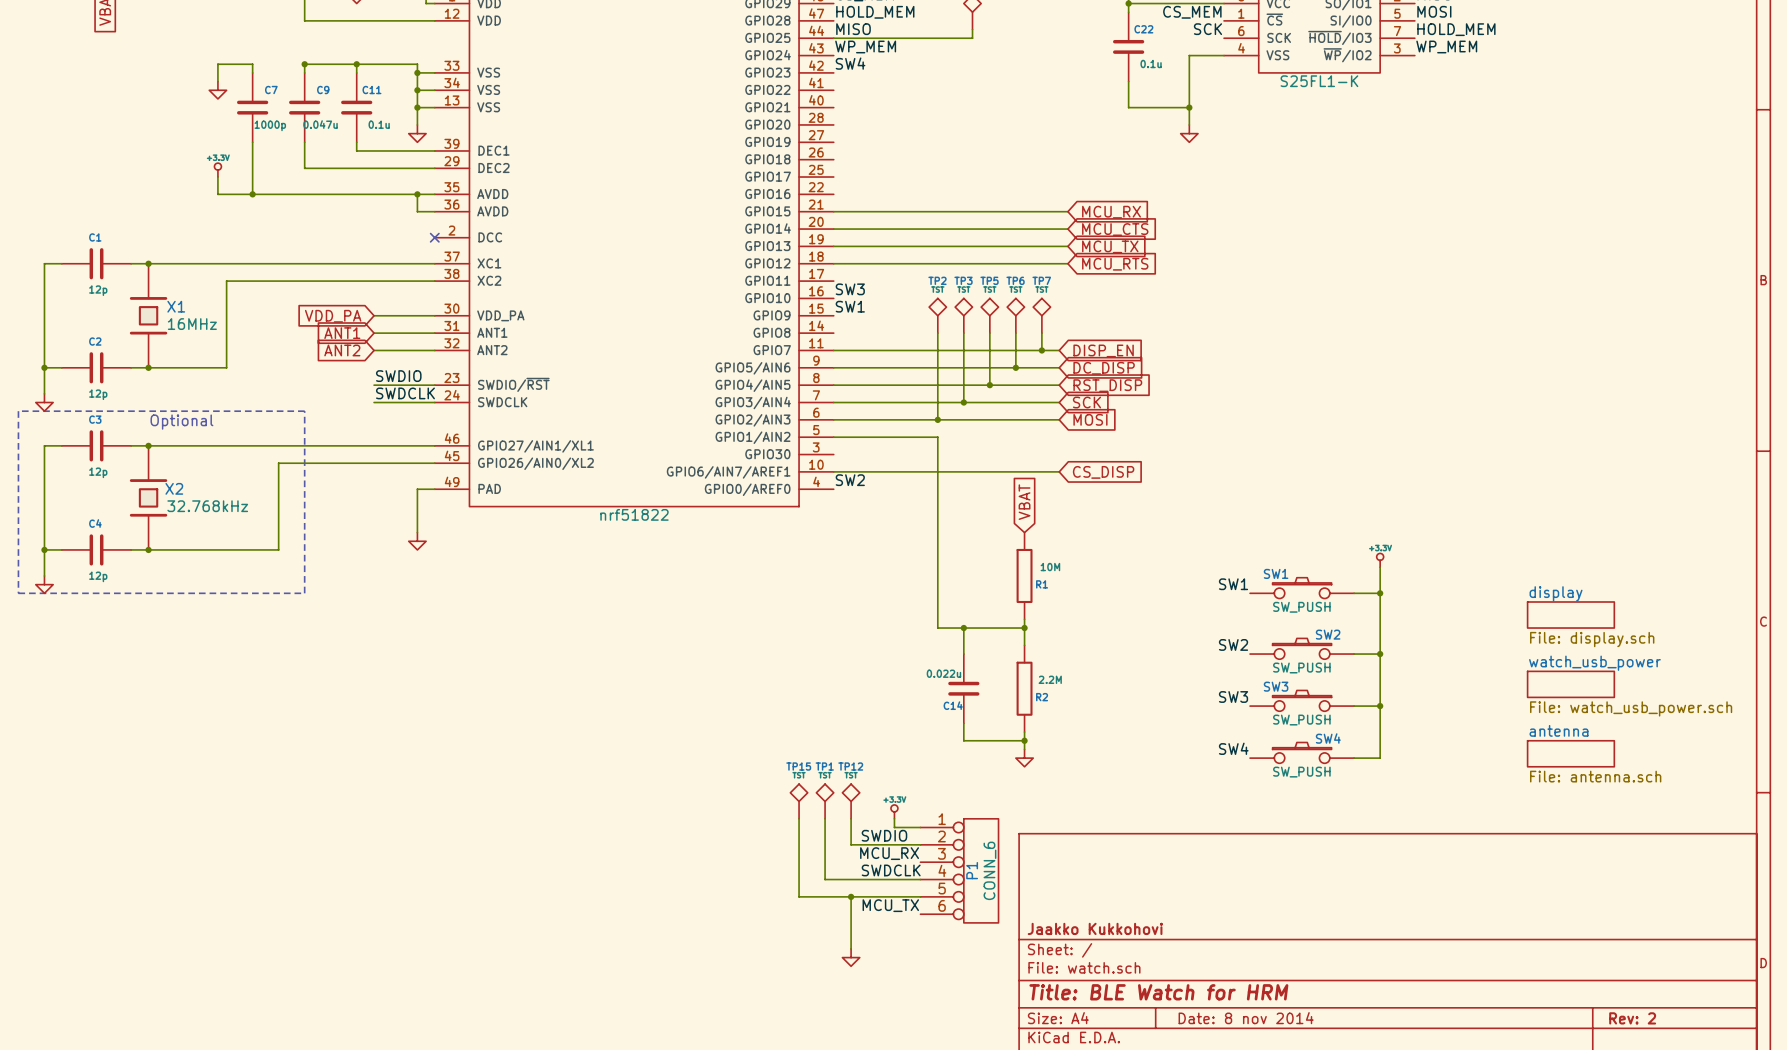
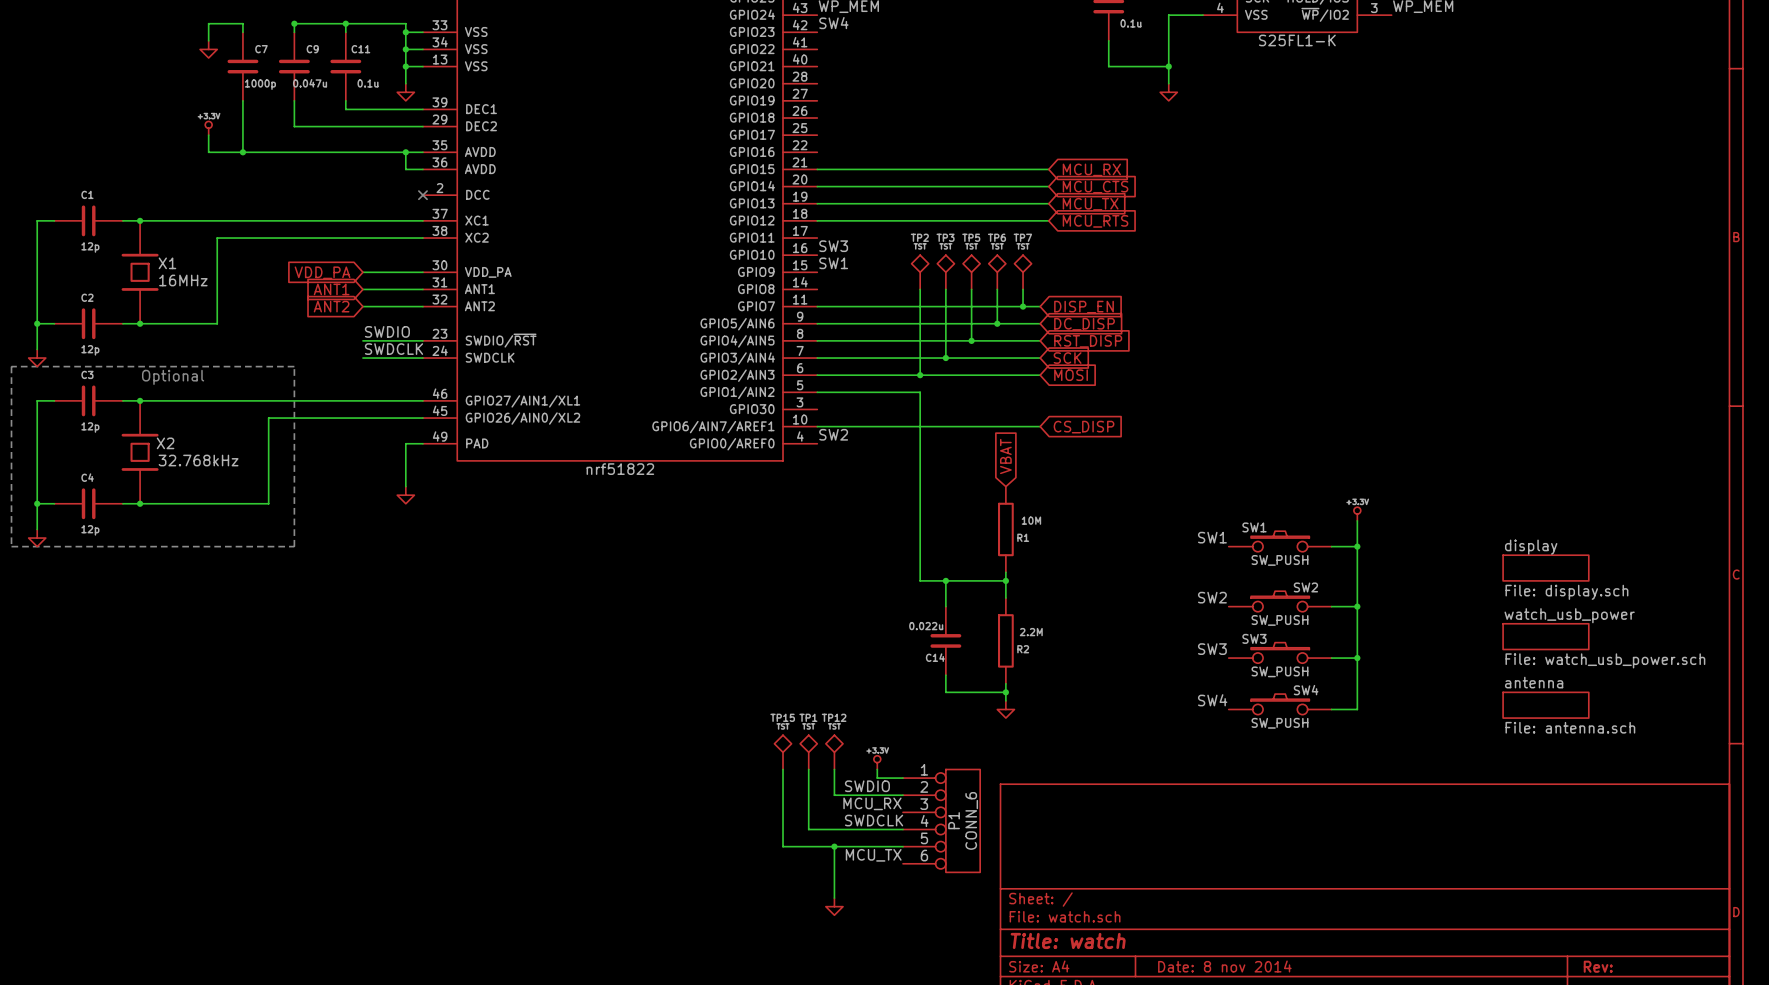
title block: Jaakko Kukkohovi (1095, 928) -> none
title block: Title: BLE Watch for HRM (1158, 992) -> Title: watch (1068, 940)
title block: Rev: 2 (1632, 1018) -> Rev: (1598, 966)

